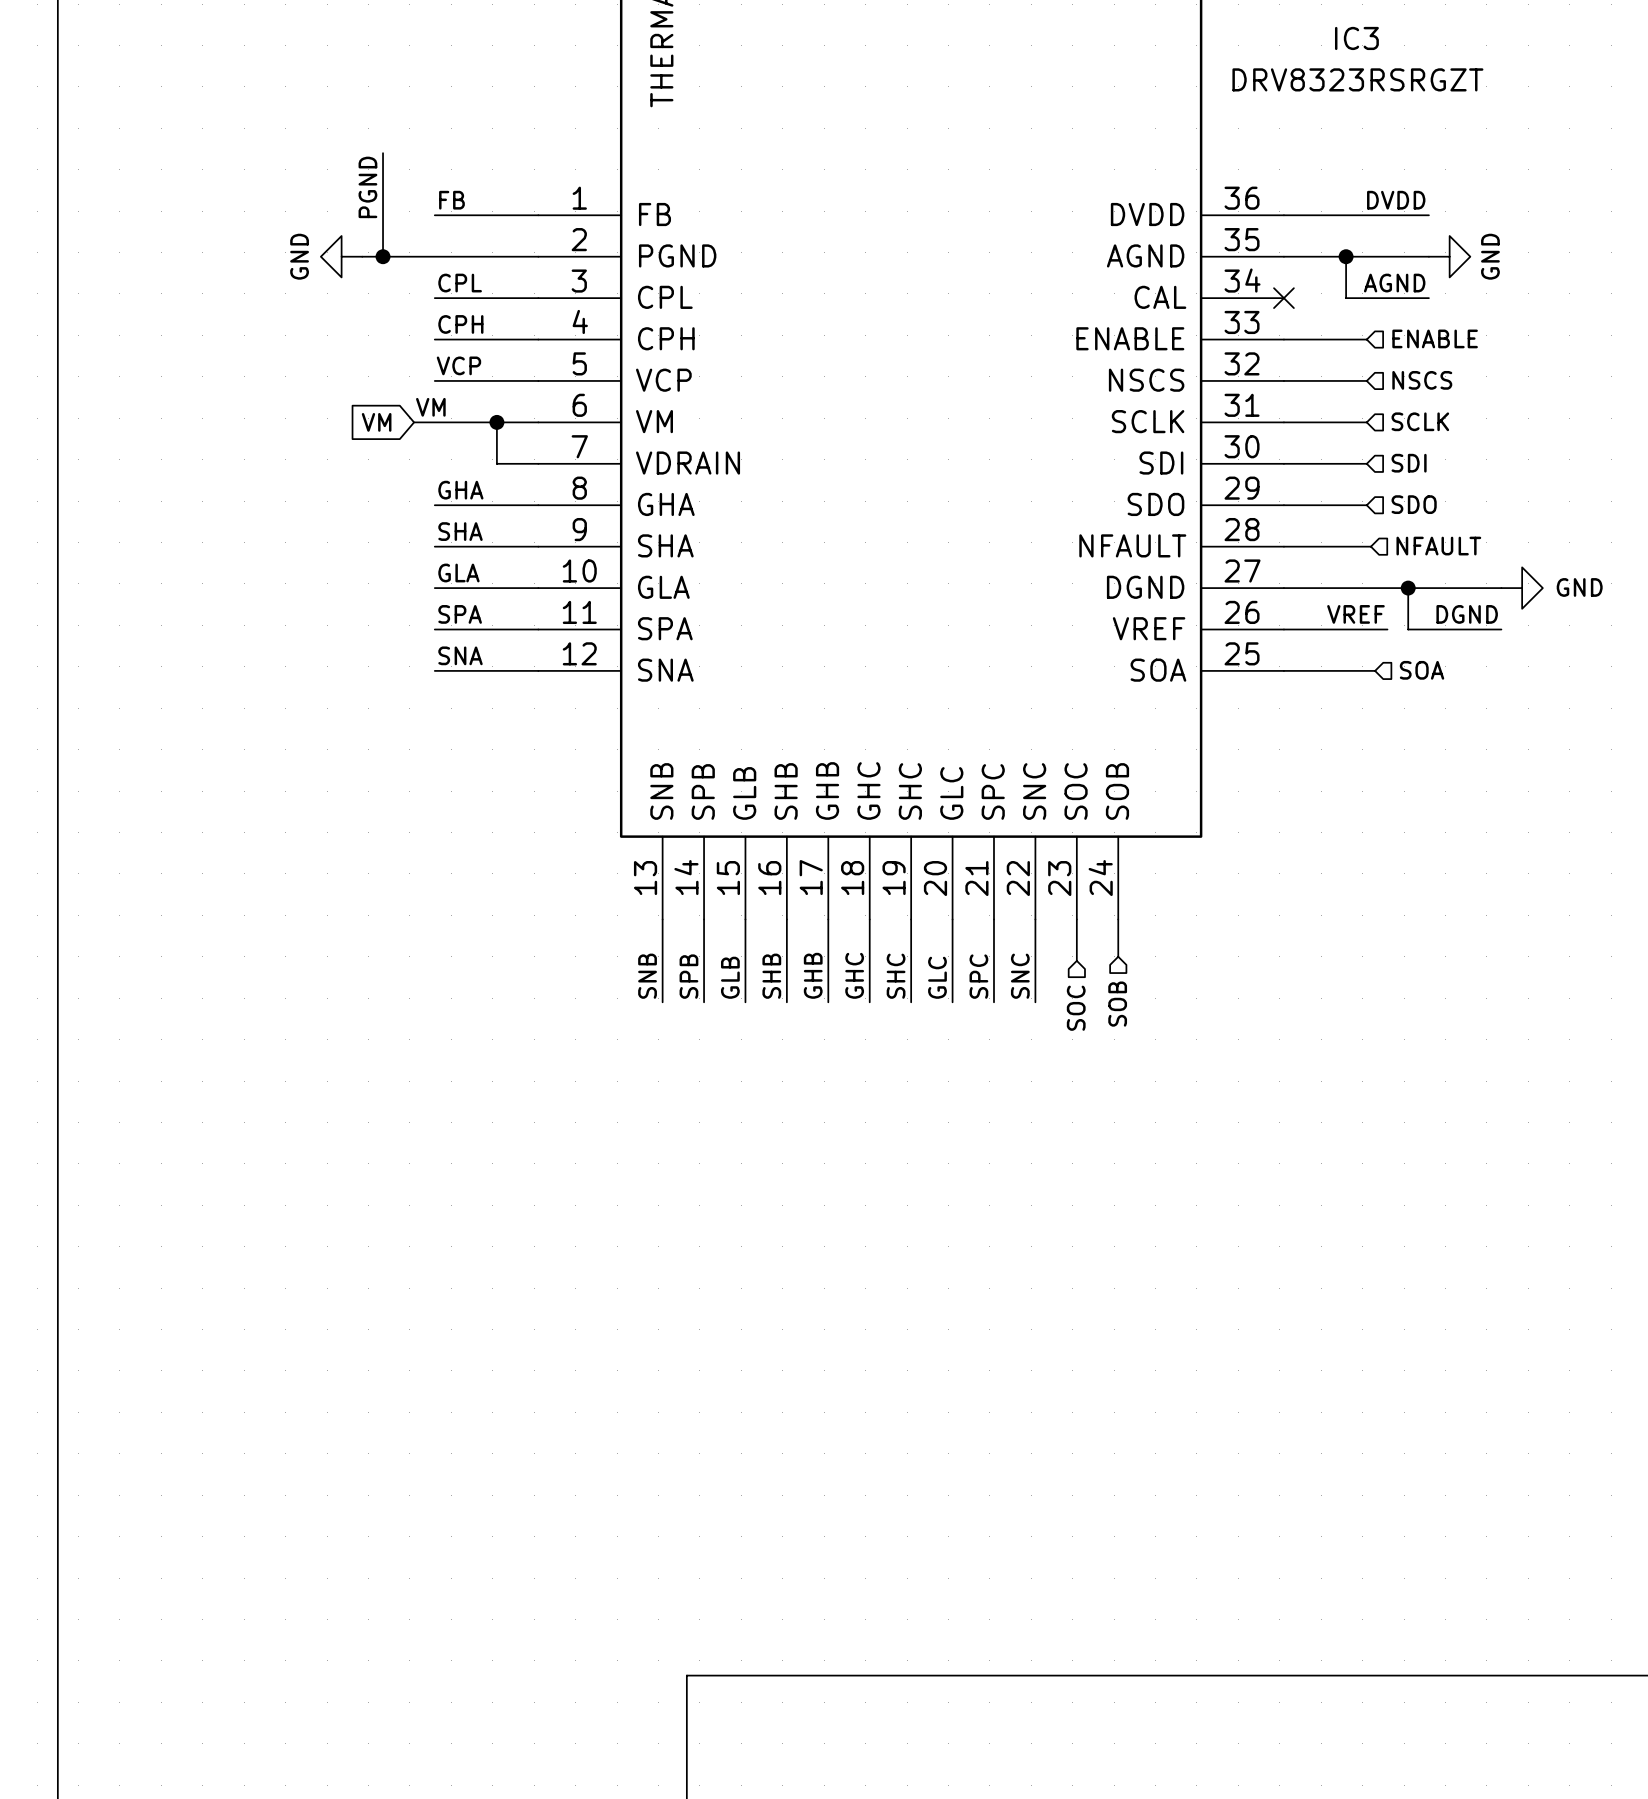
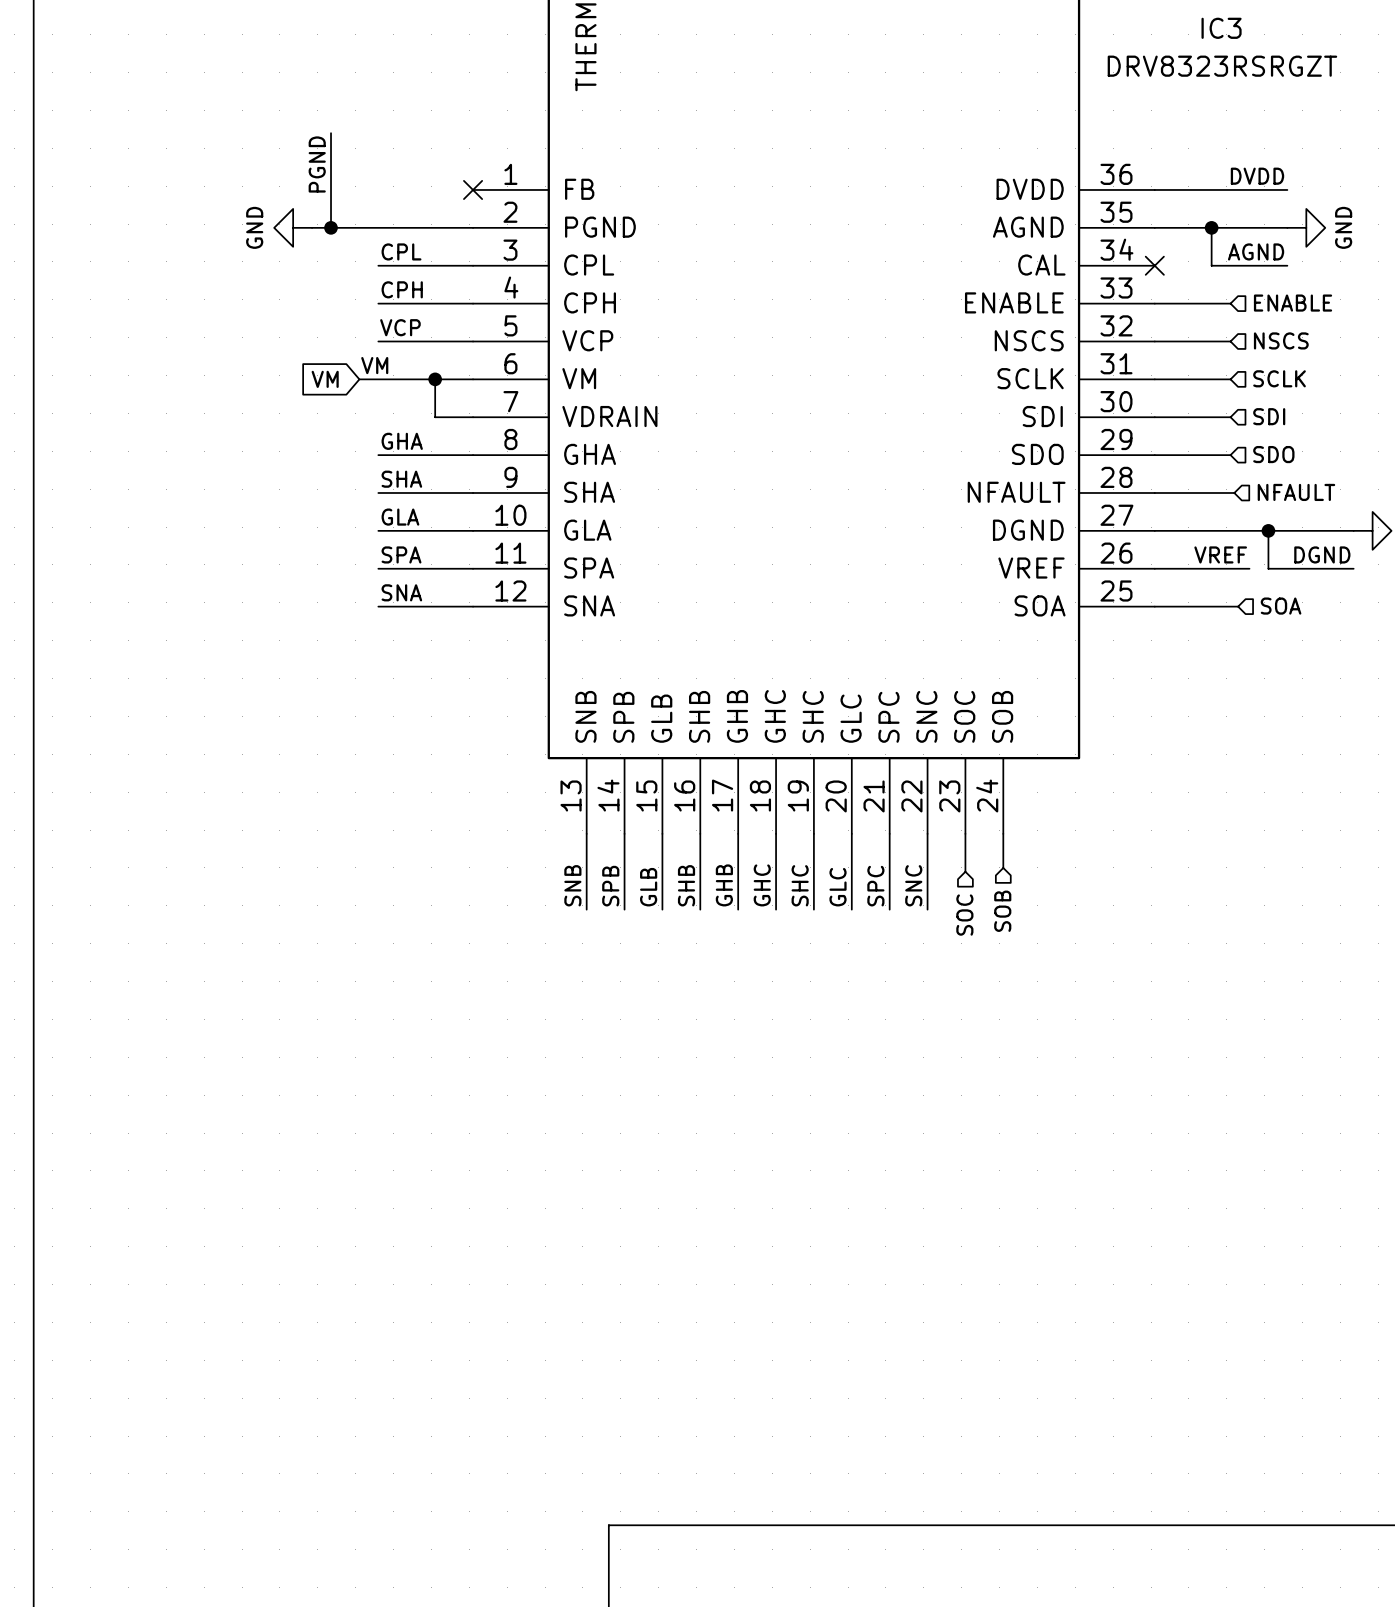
label: FB (451, 200) -> none
wire: (434, 215) (538, 215) -> none
no-connect mark: none -> (473, 189)

